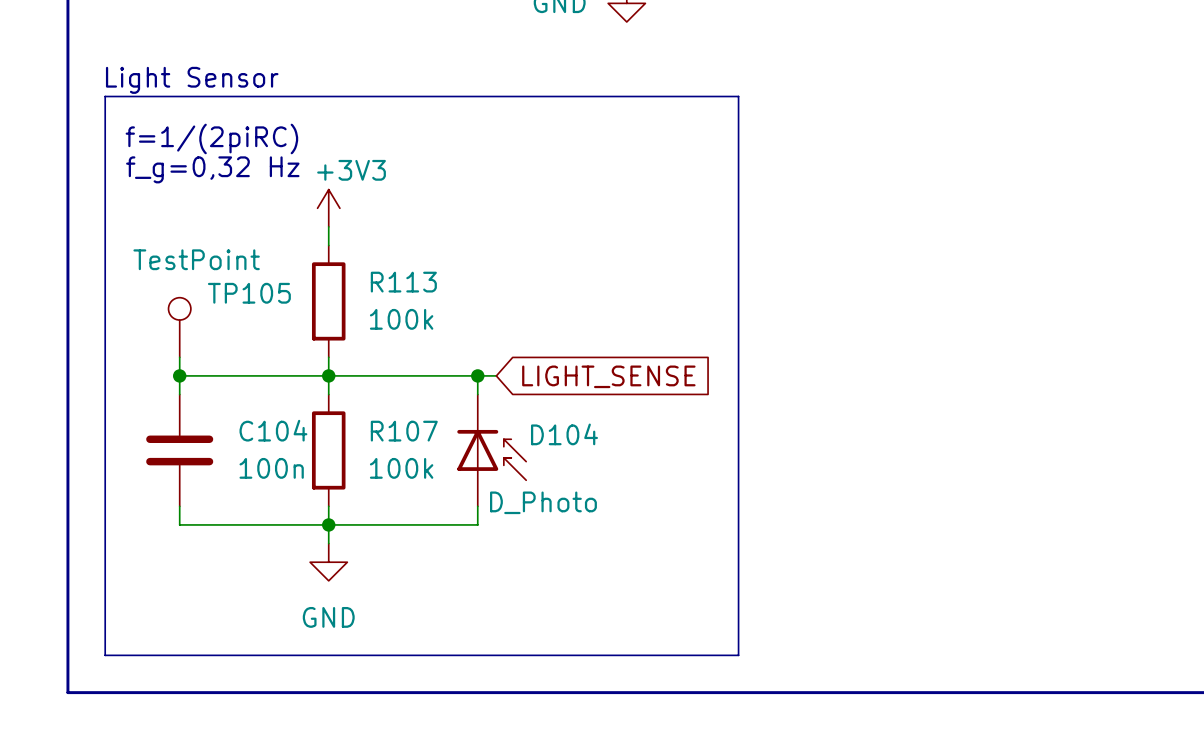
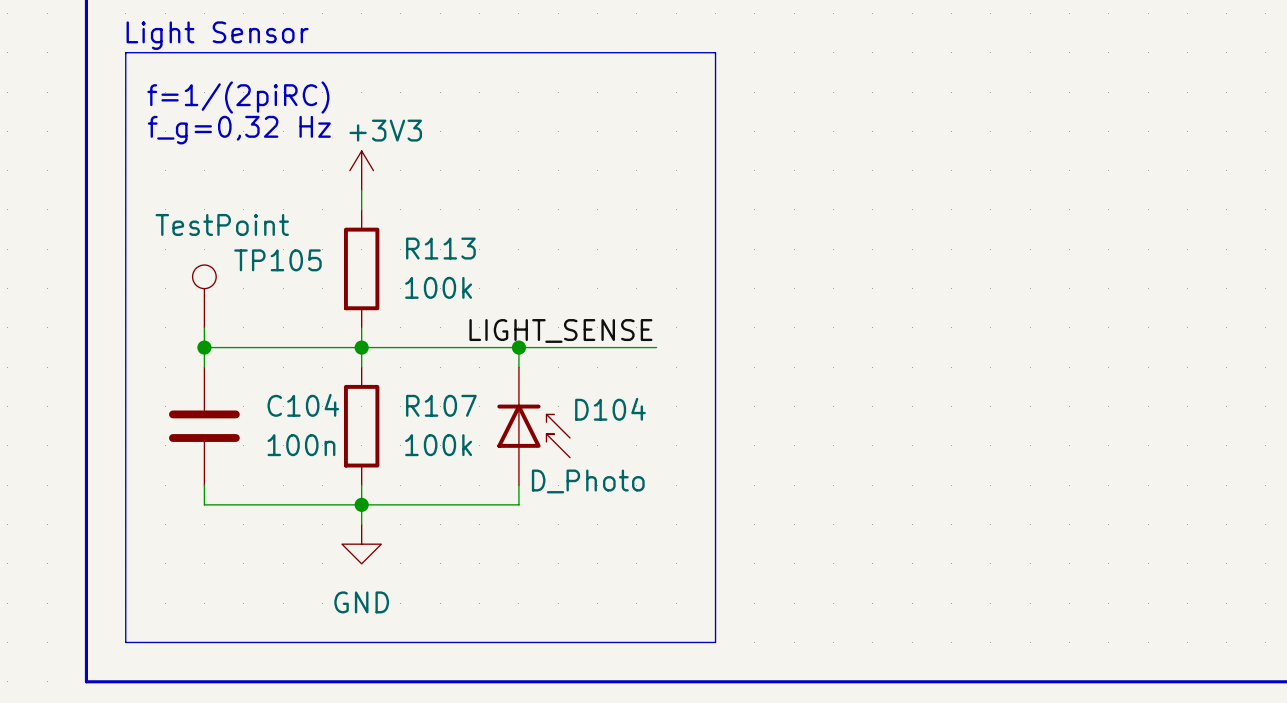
line: (664, 96) (738, 96) (738, 655) (664, 655) -> (715, 52) (715, 642)
label: none -> LIGHT_SENSE (560, 330)
wire: none -> (538, 347) (656, 347)
global label: LIGHT_SENSE (608, 376) -> none

